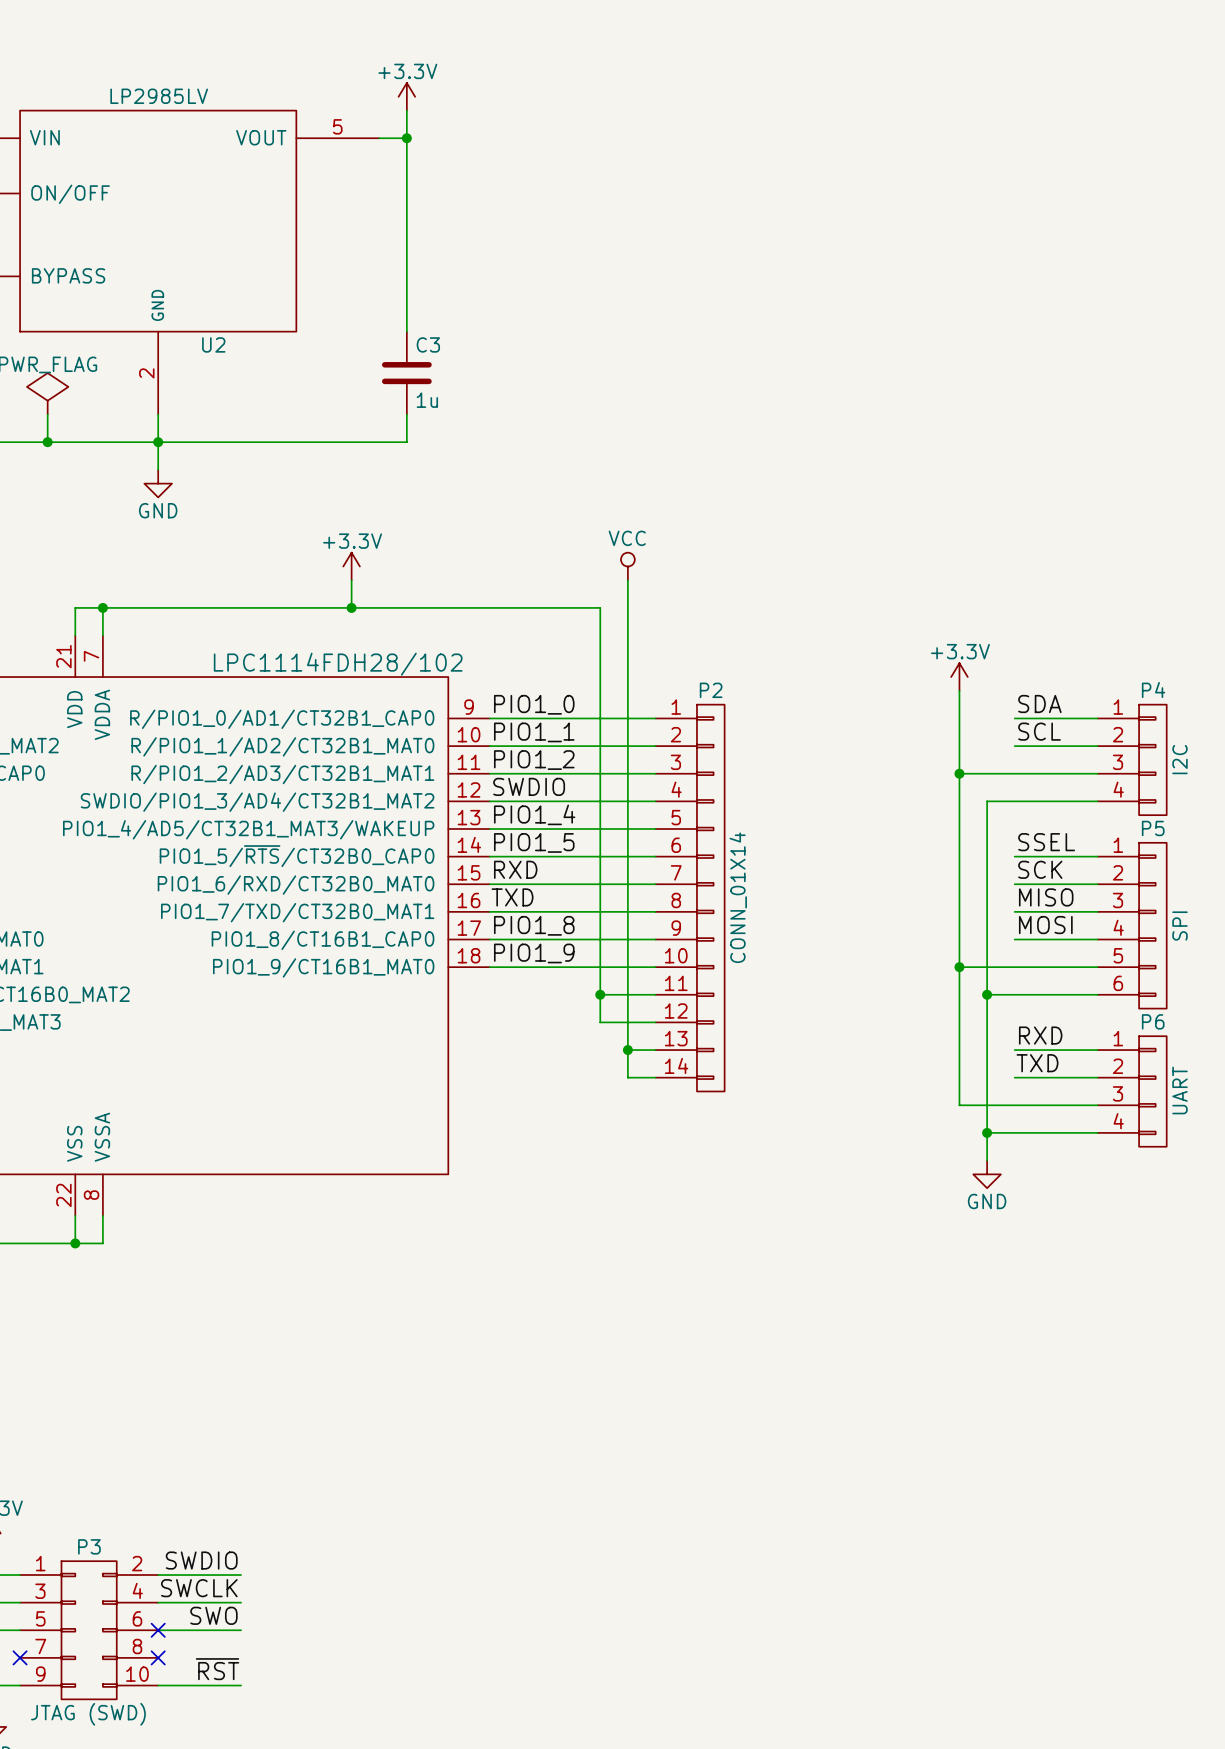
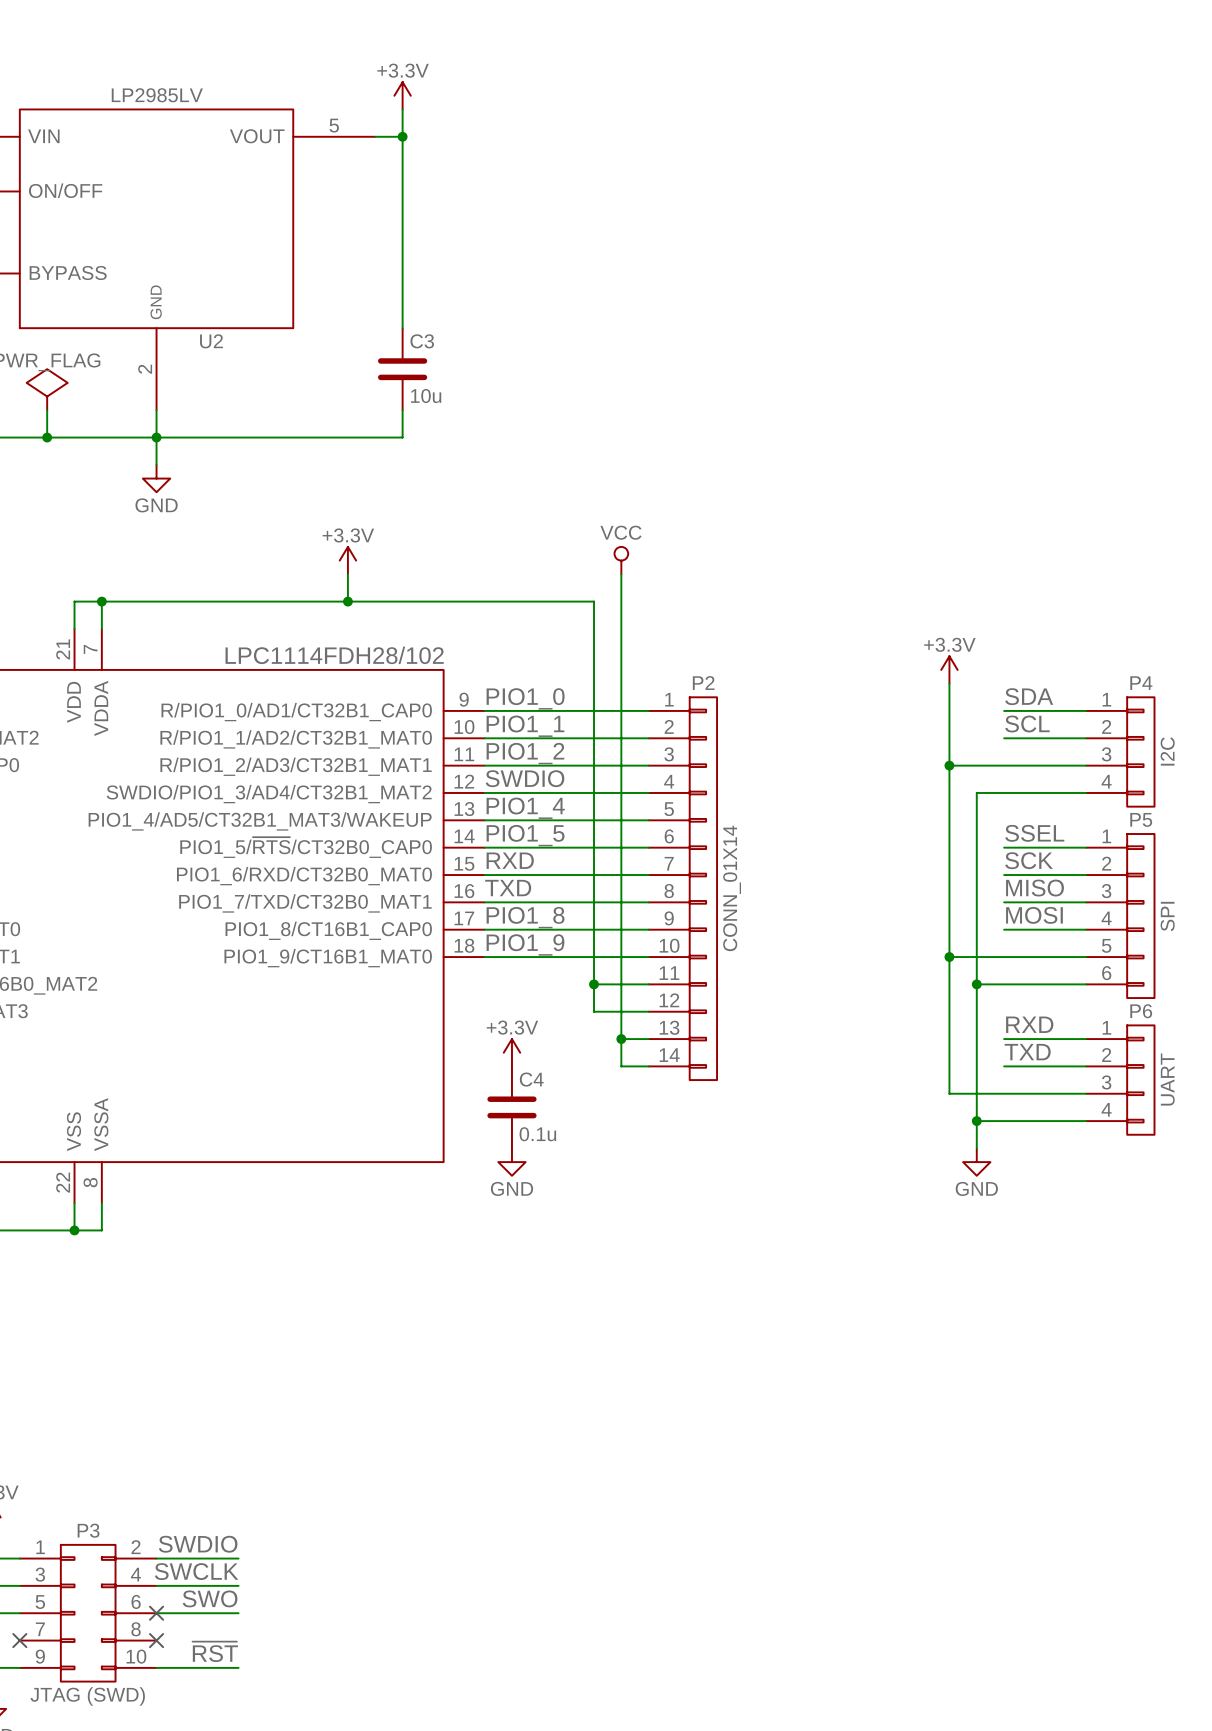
C3 value: 1u (427, 400) -> 10u (426, 396)
power symbol: none -> +3.3V (511, 1052)
C4: none -> 0.1u (511, 1107)
power symbol: none -> GND (511, 1162)

